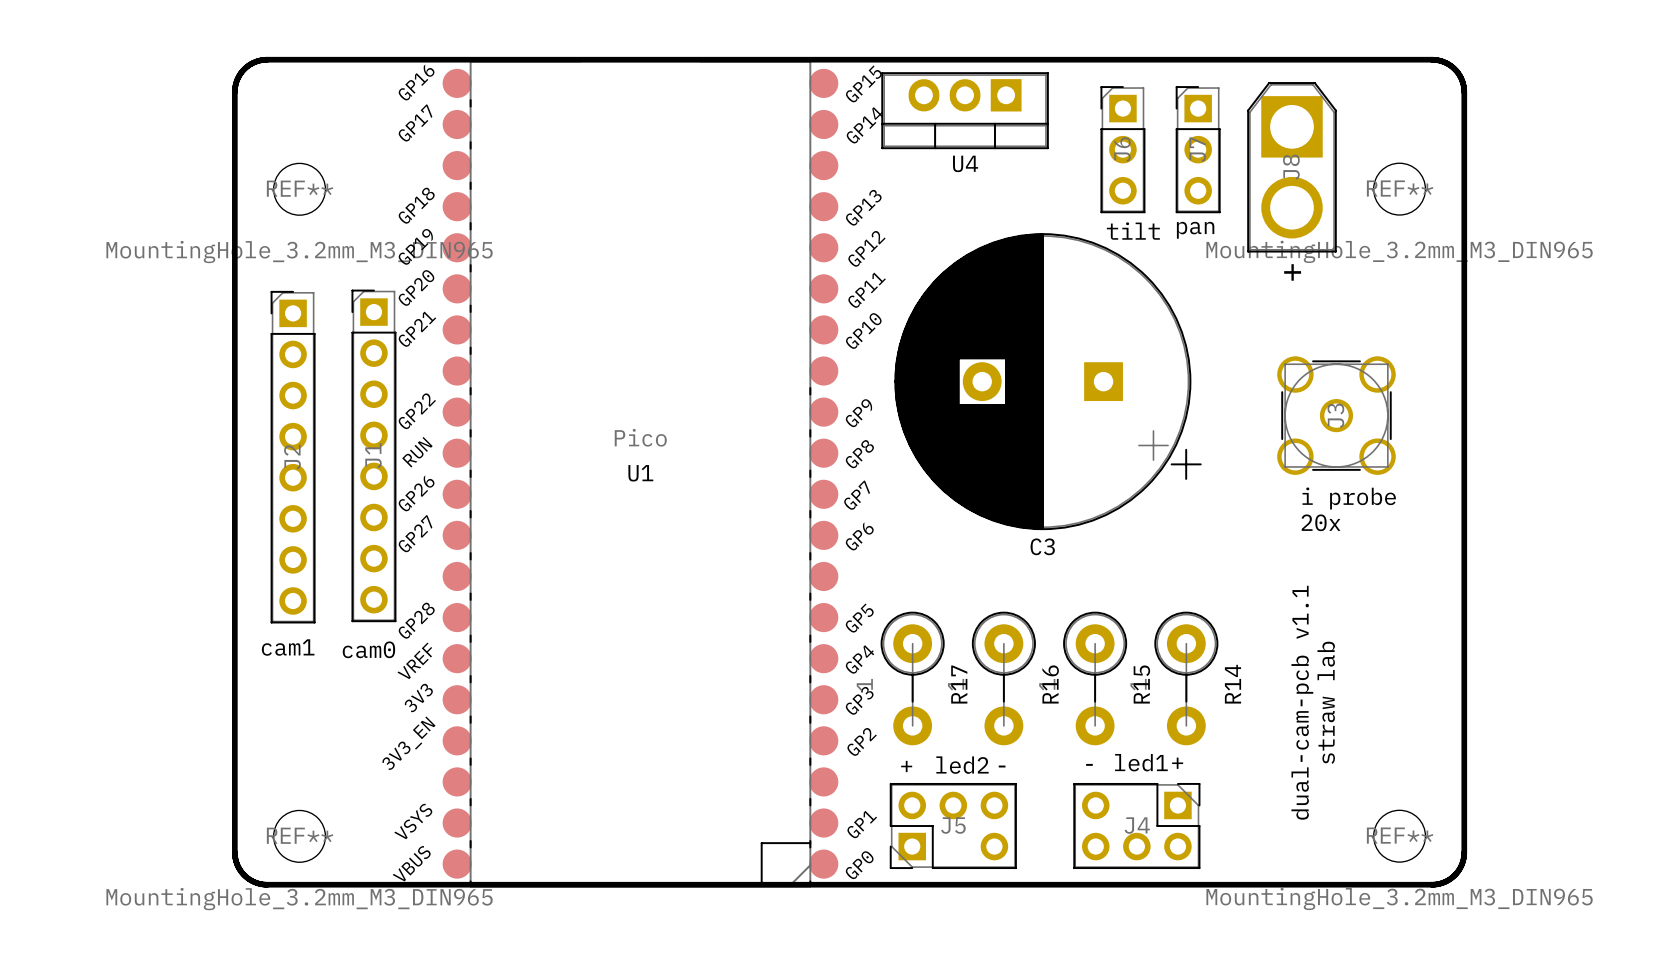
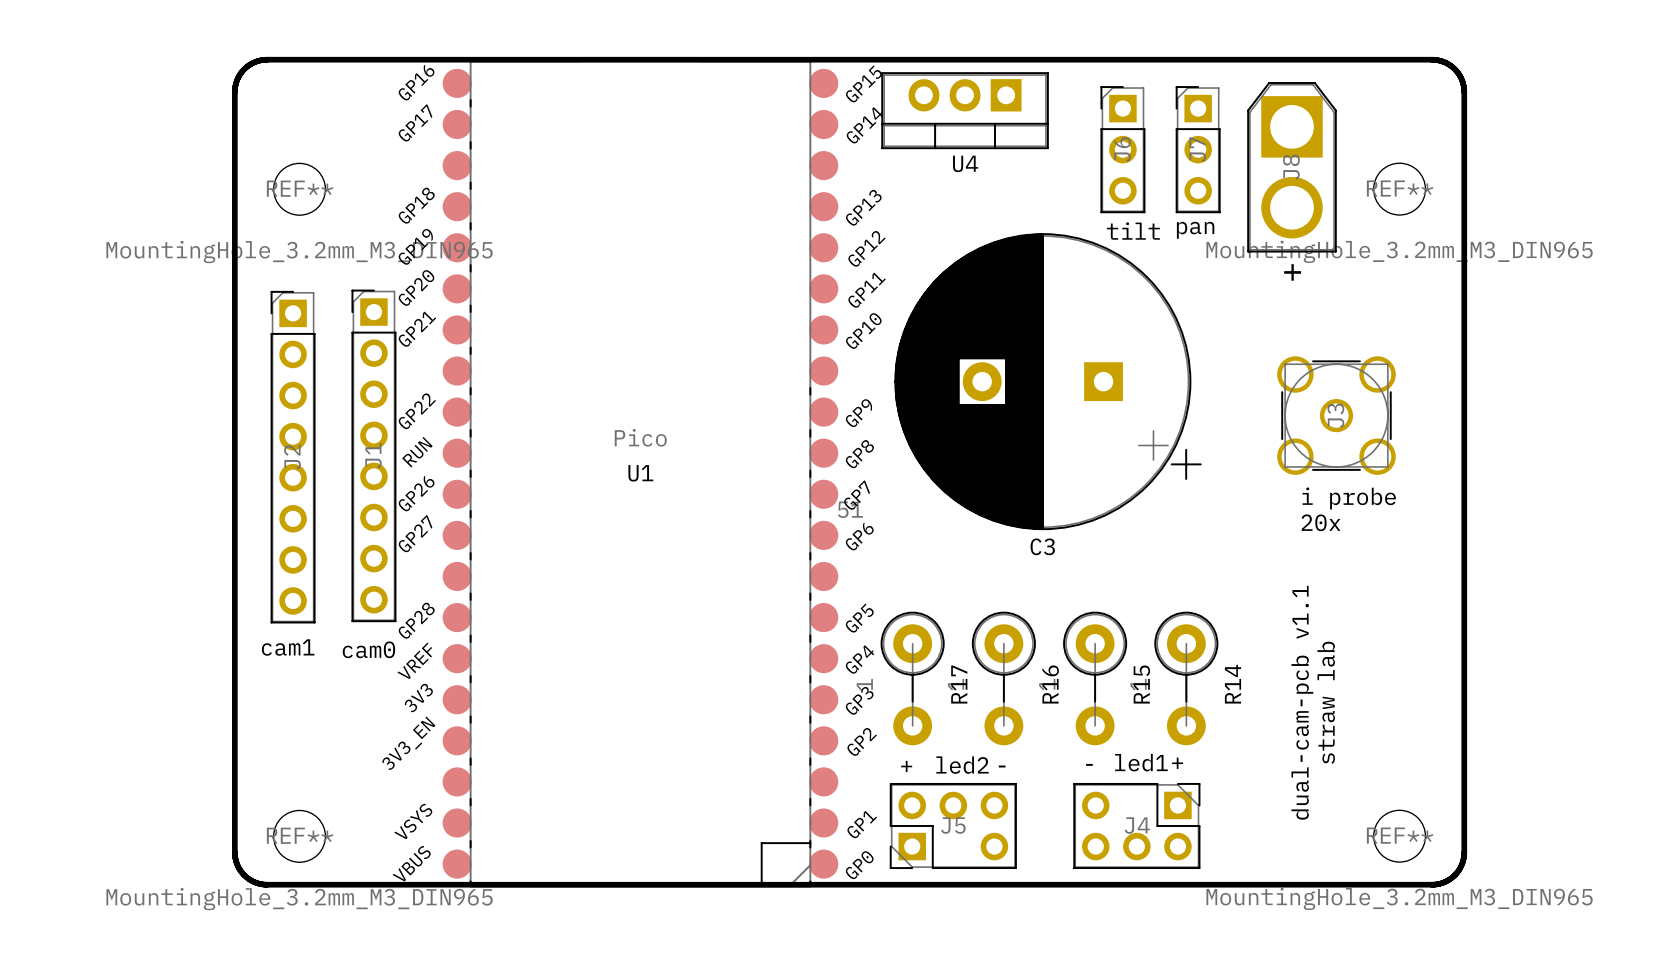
part: none -> 51 (850, 509)

